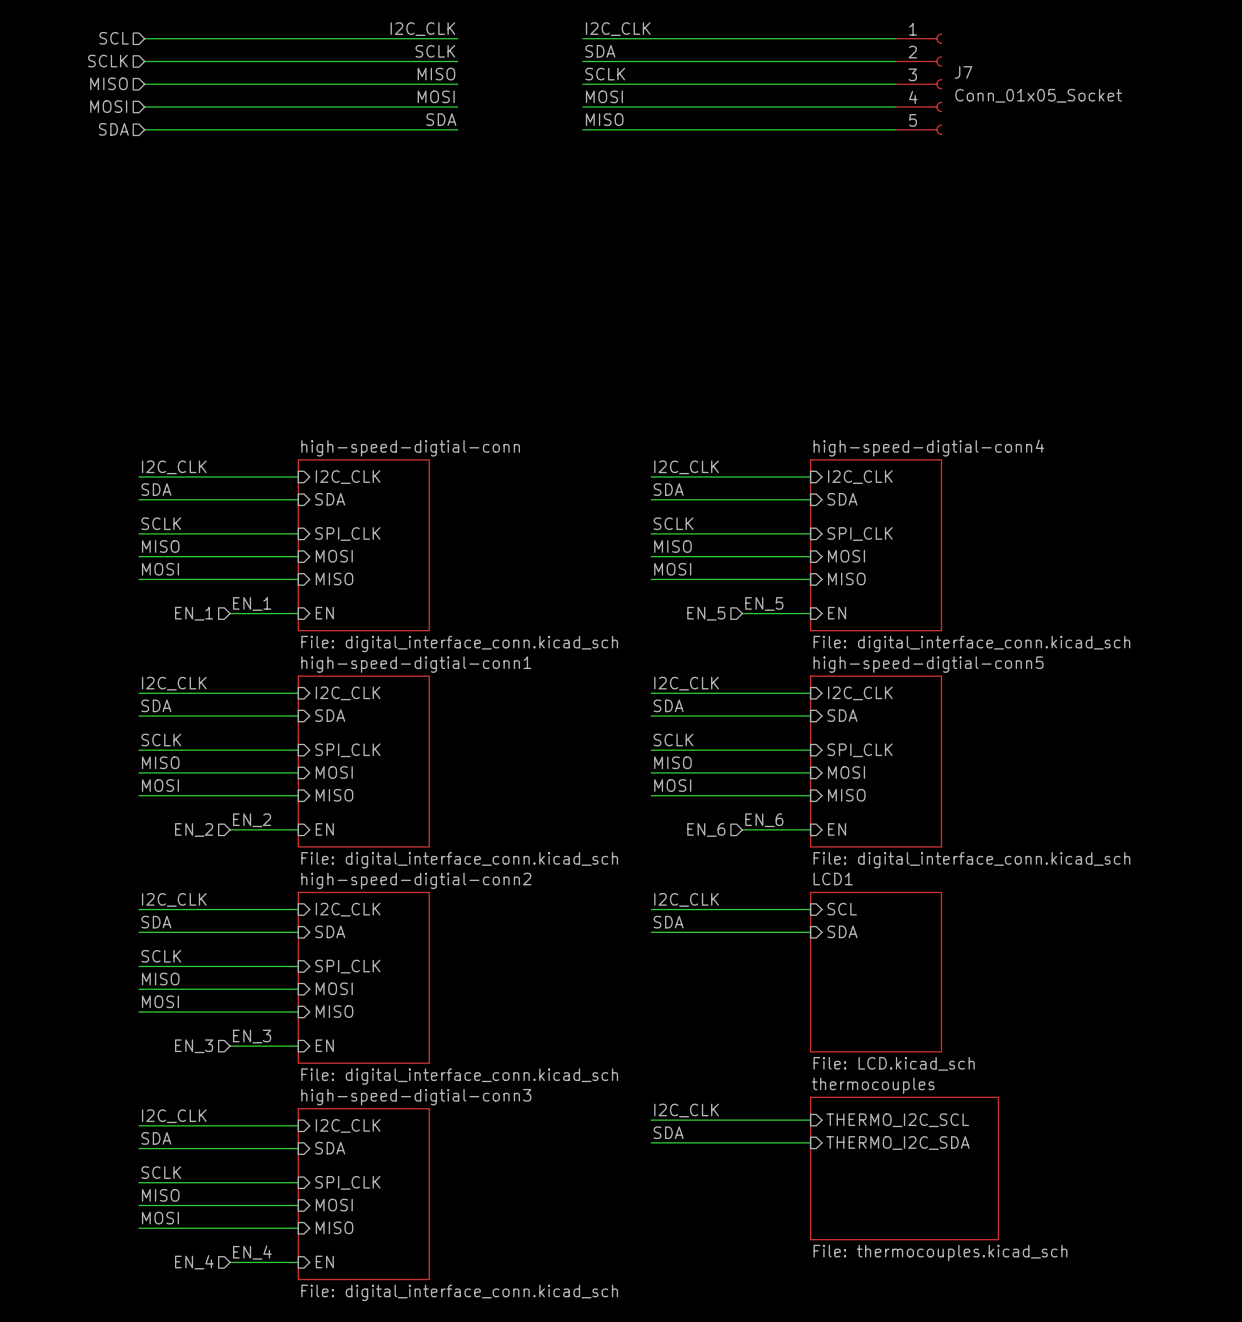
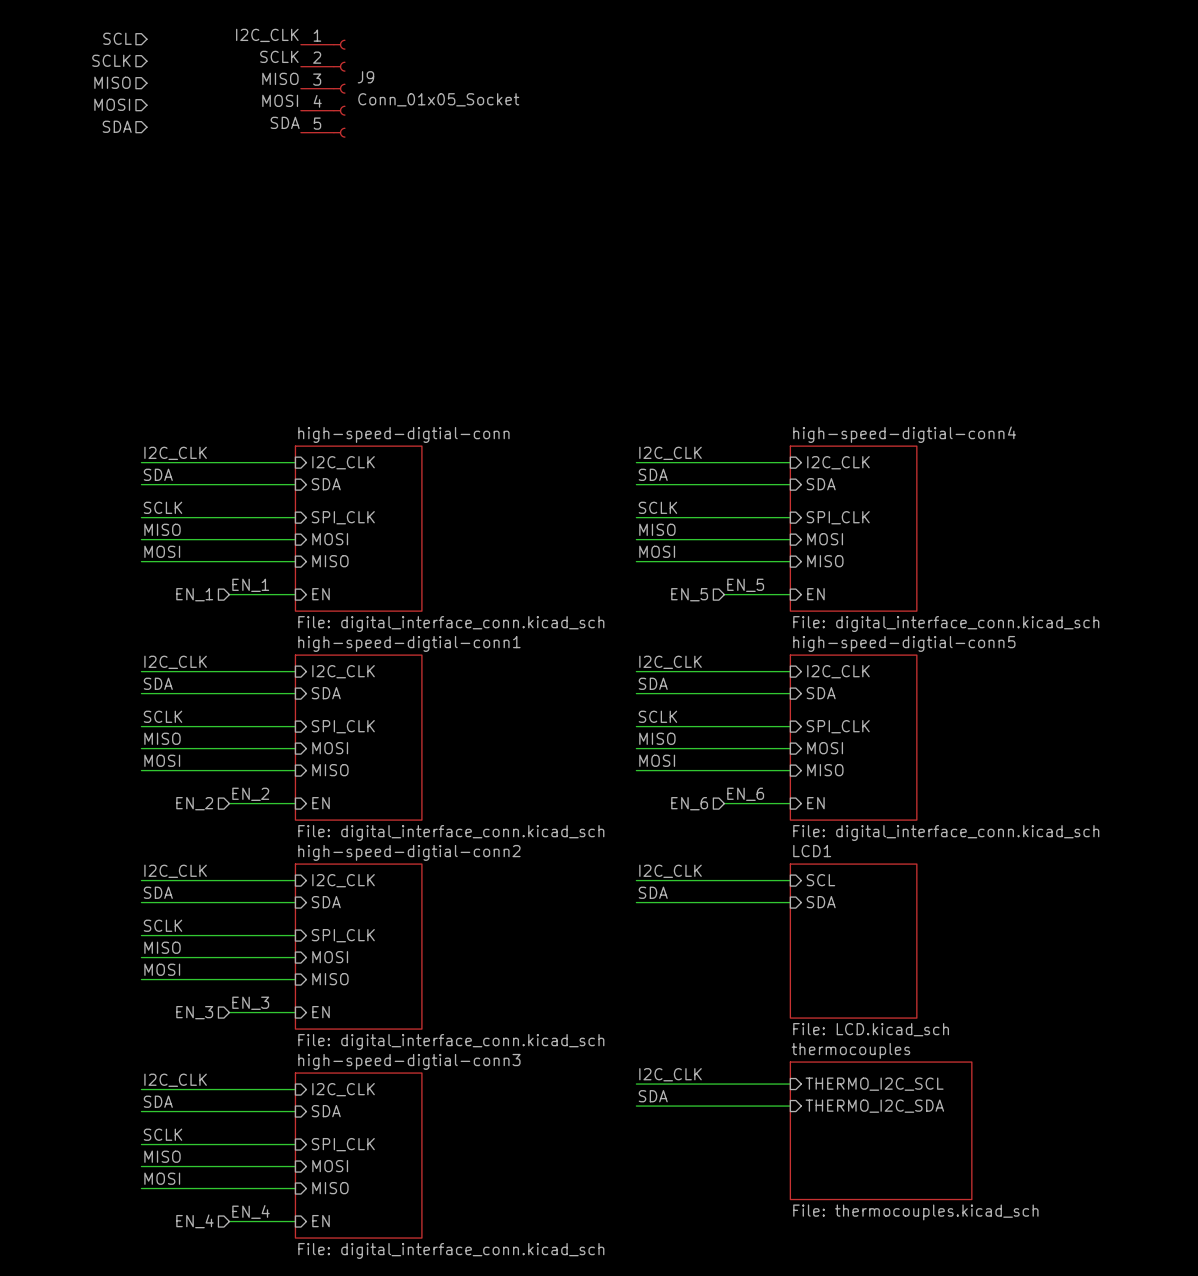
label: I2C_CLK (422, 29) -> none
label: I2C_CLK (618, 29) -> none
label: none -> I2C_CLK (267, 35)
wire: (144, 38) (457, 38) -> none
wire: (582, 38) (895, 38) -> none
label: SCLK (435, 51) -> none
label: SDA (600, 51) -> none
label: none -> SCLK (279, 56)
wire: (144, 61) (457, 61) -> none
wire: (582, 61) (895, 61) -> none
label: MISO (436, 74) -> none
label: SCLK (605, 74) -> none
label: none -> MISO (280, 78)
wire: (144, 84) (457, 84) -> none
wire: (582, 84) (895, 84) -> none
J7: Conn_01x05_Socket (919, 84) -> none
J9: none -> Conn_01x05_Socket (323, 88)
label: MOSI (436, 96) -> none
label: MOSI (604, 96) -> none
label: none -> MOSI (280, 100)
wire: (144, 107) (457, 107) -> none
wire: (582, 107) (895, 107) -> none
label: SDA (441, 119) -> none
label: MISO (604, 119) -> none
label: none -> SDA (285, 122)
wire: (144, 129) (457, 129) -> none
wire: (582, 129) (895, 129) -> none

